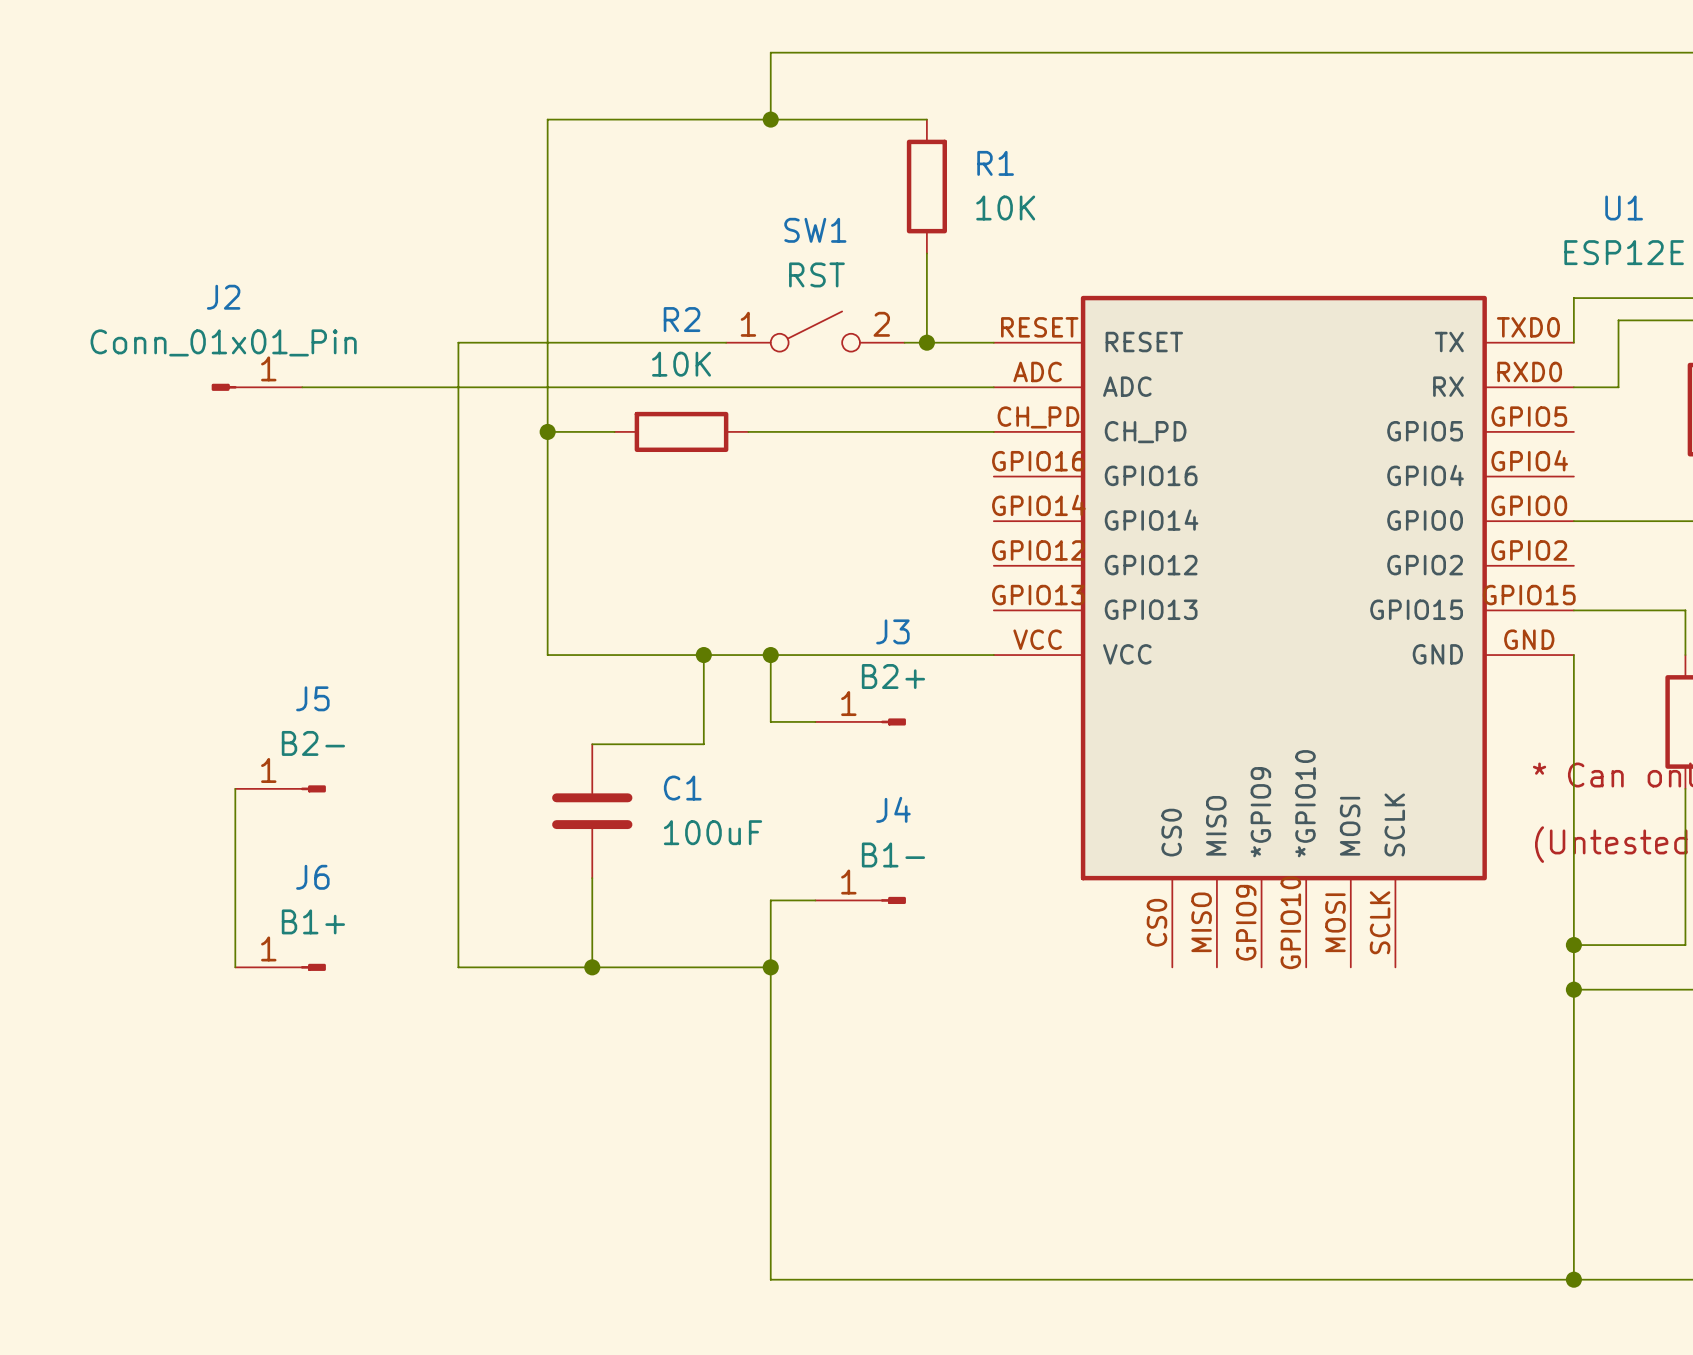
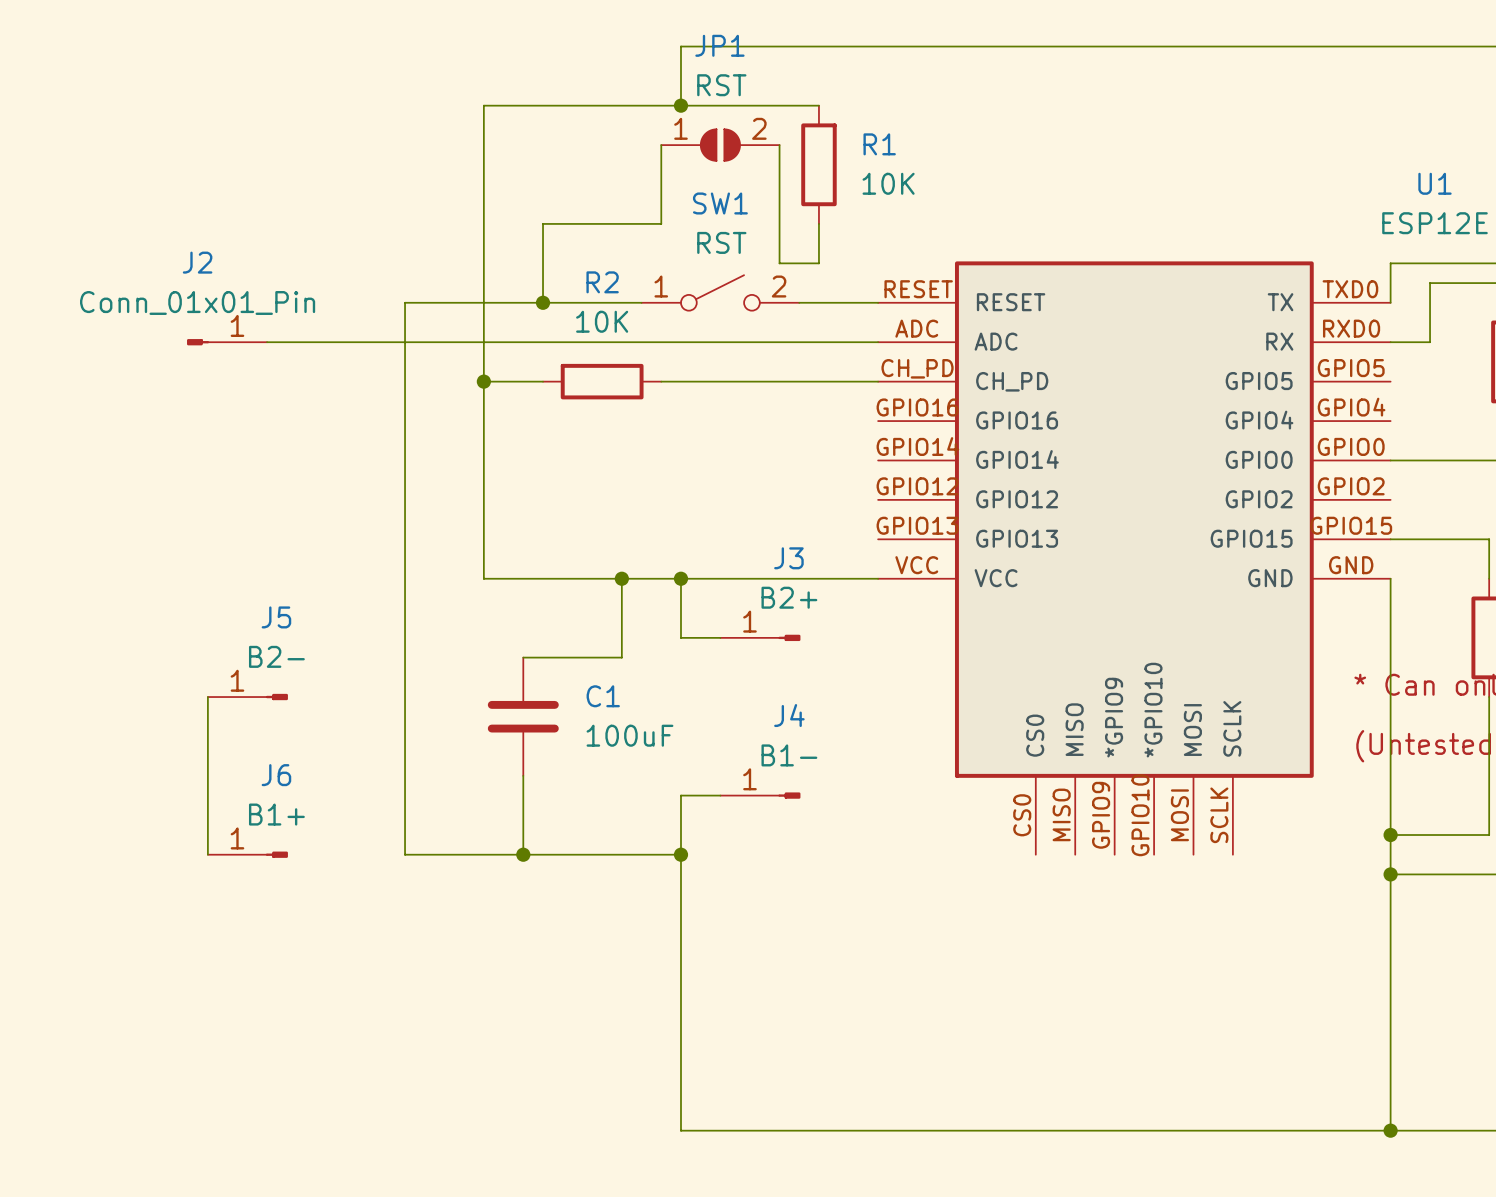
wire: none -> (661, 145) (661, 223) (543, 223) (543, 302)
JP1: none -> RST (720, 145)
wire: (926, 298) (926, 342) -> (818, 263) (779, 263) (779, 145)
junction: none -> (543, 302)
junction: (926, 342) -> none

